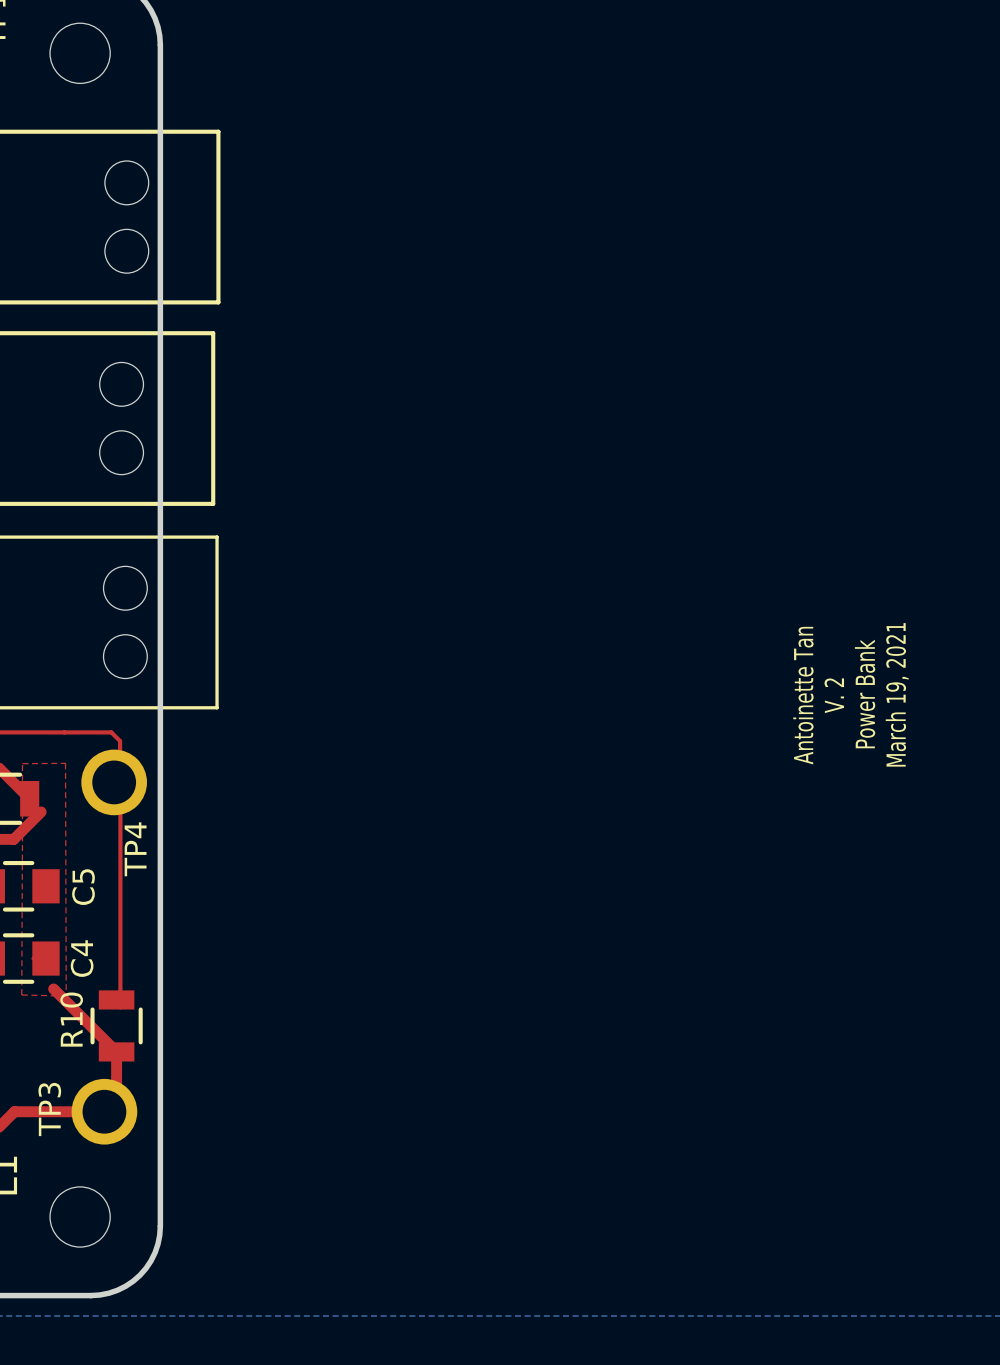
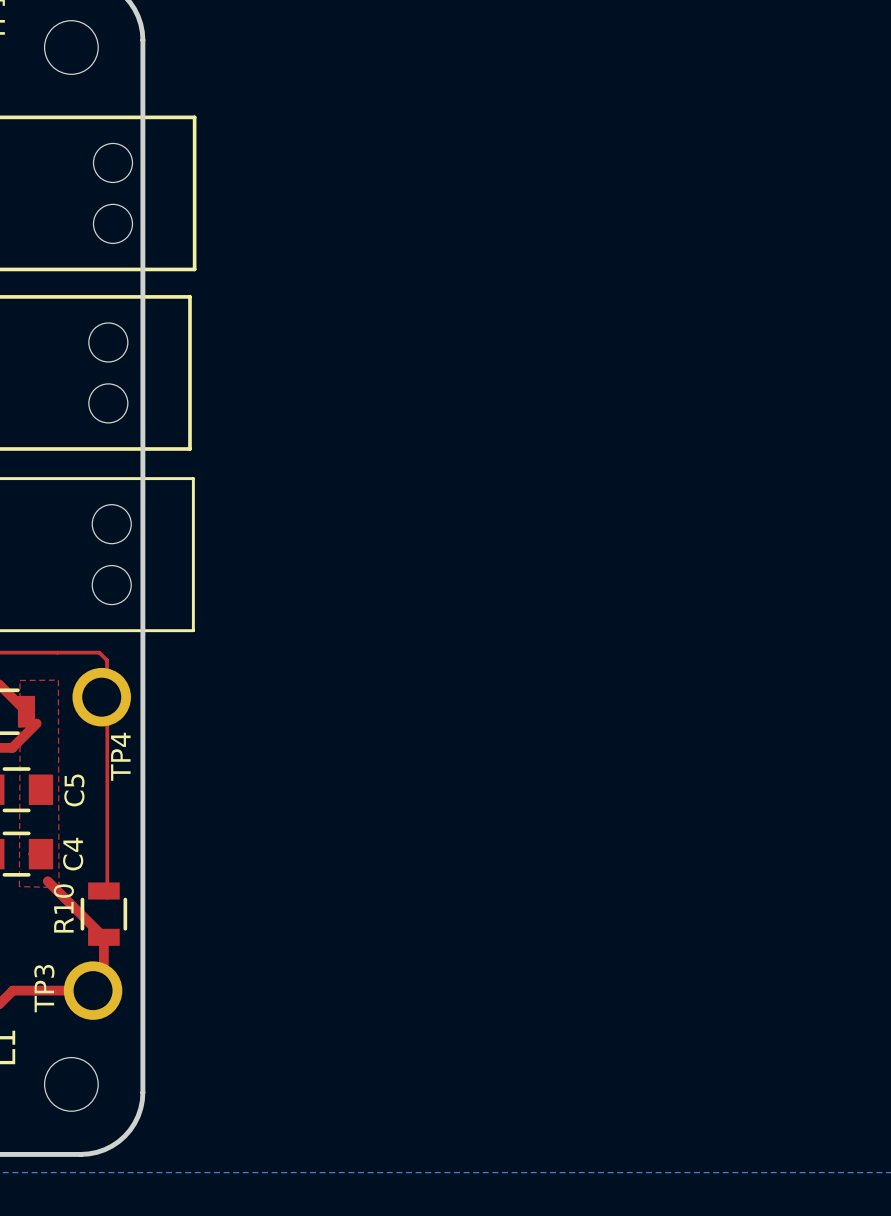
text: Power Bank (865, 694) -> none
text: March 19, 2021 (897, 694) -> none
text: Antoinette Tan (803, 695) -> none
text: V. 2 (834, 695) -> none

